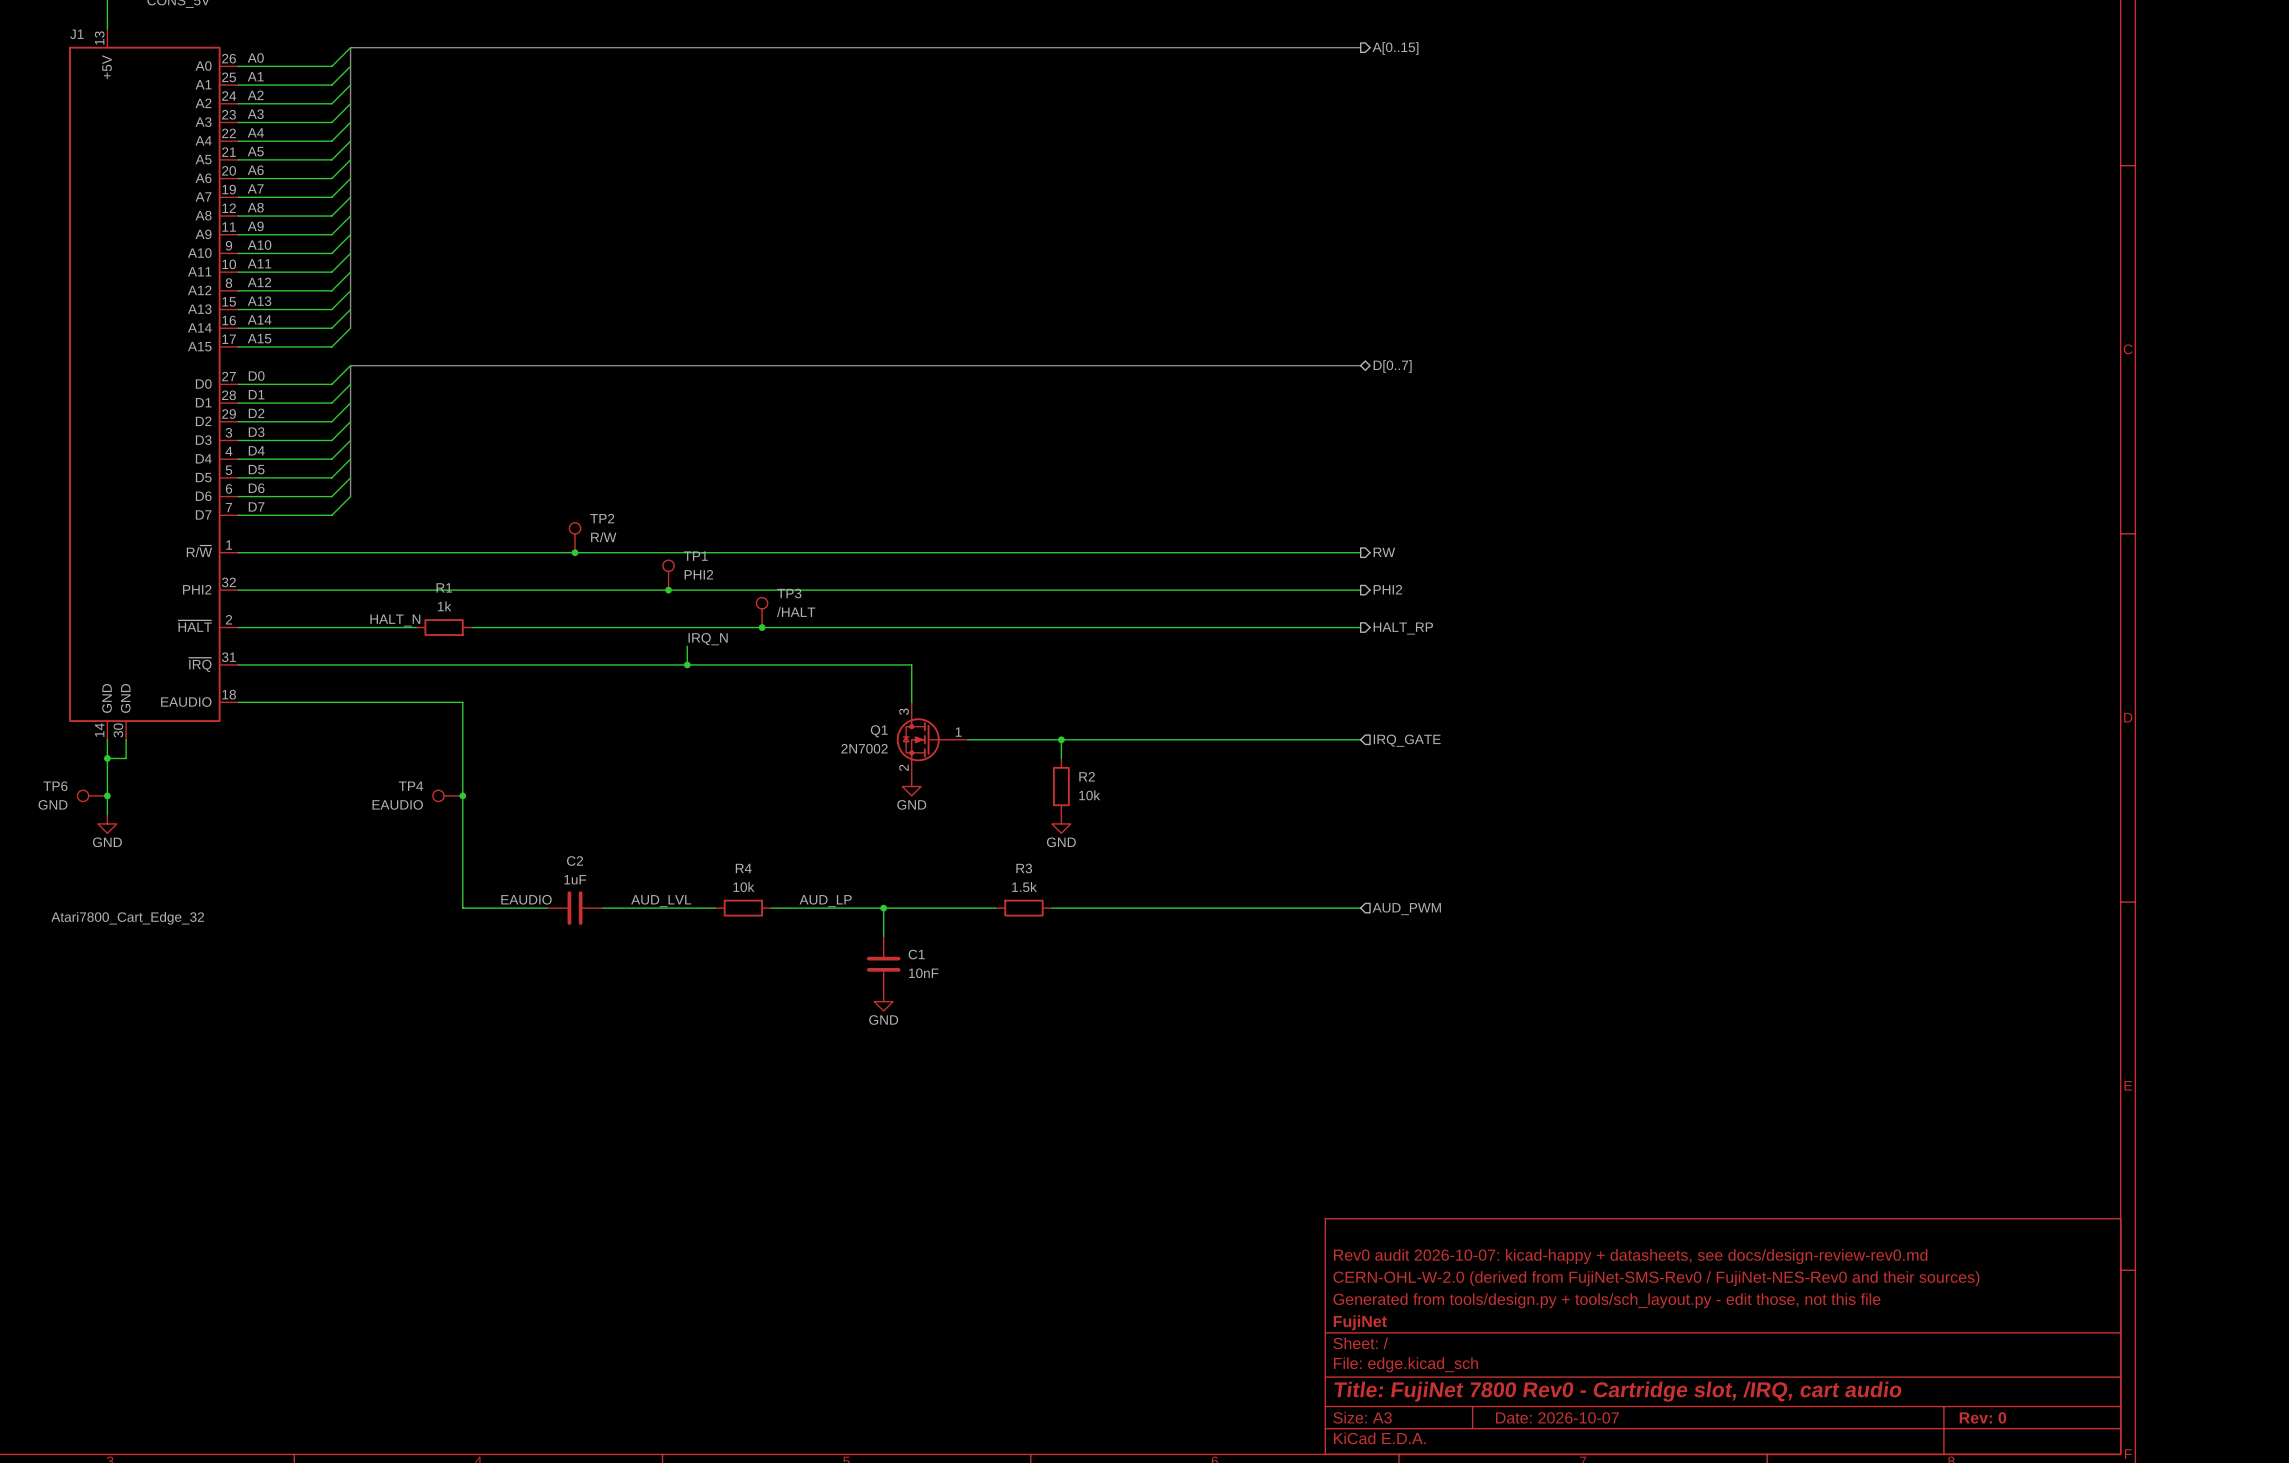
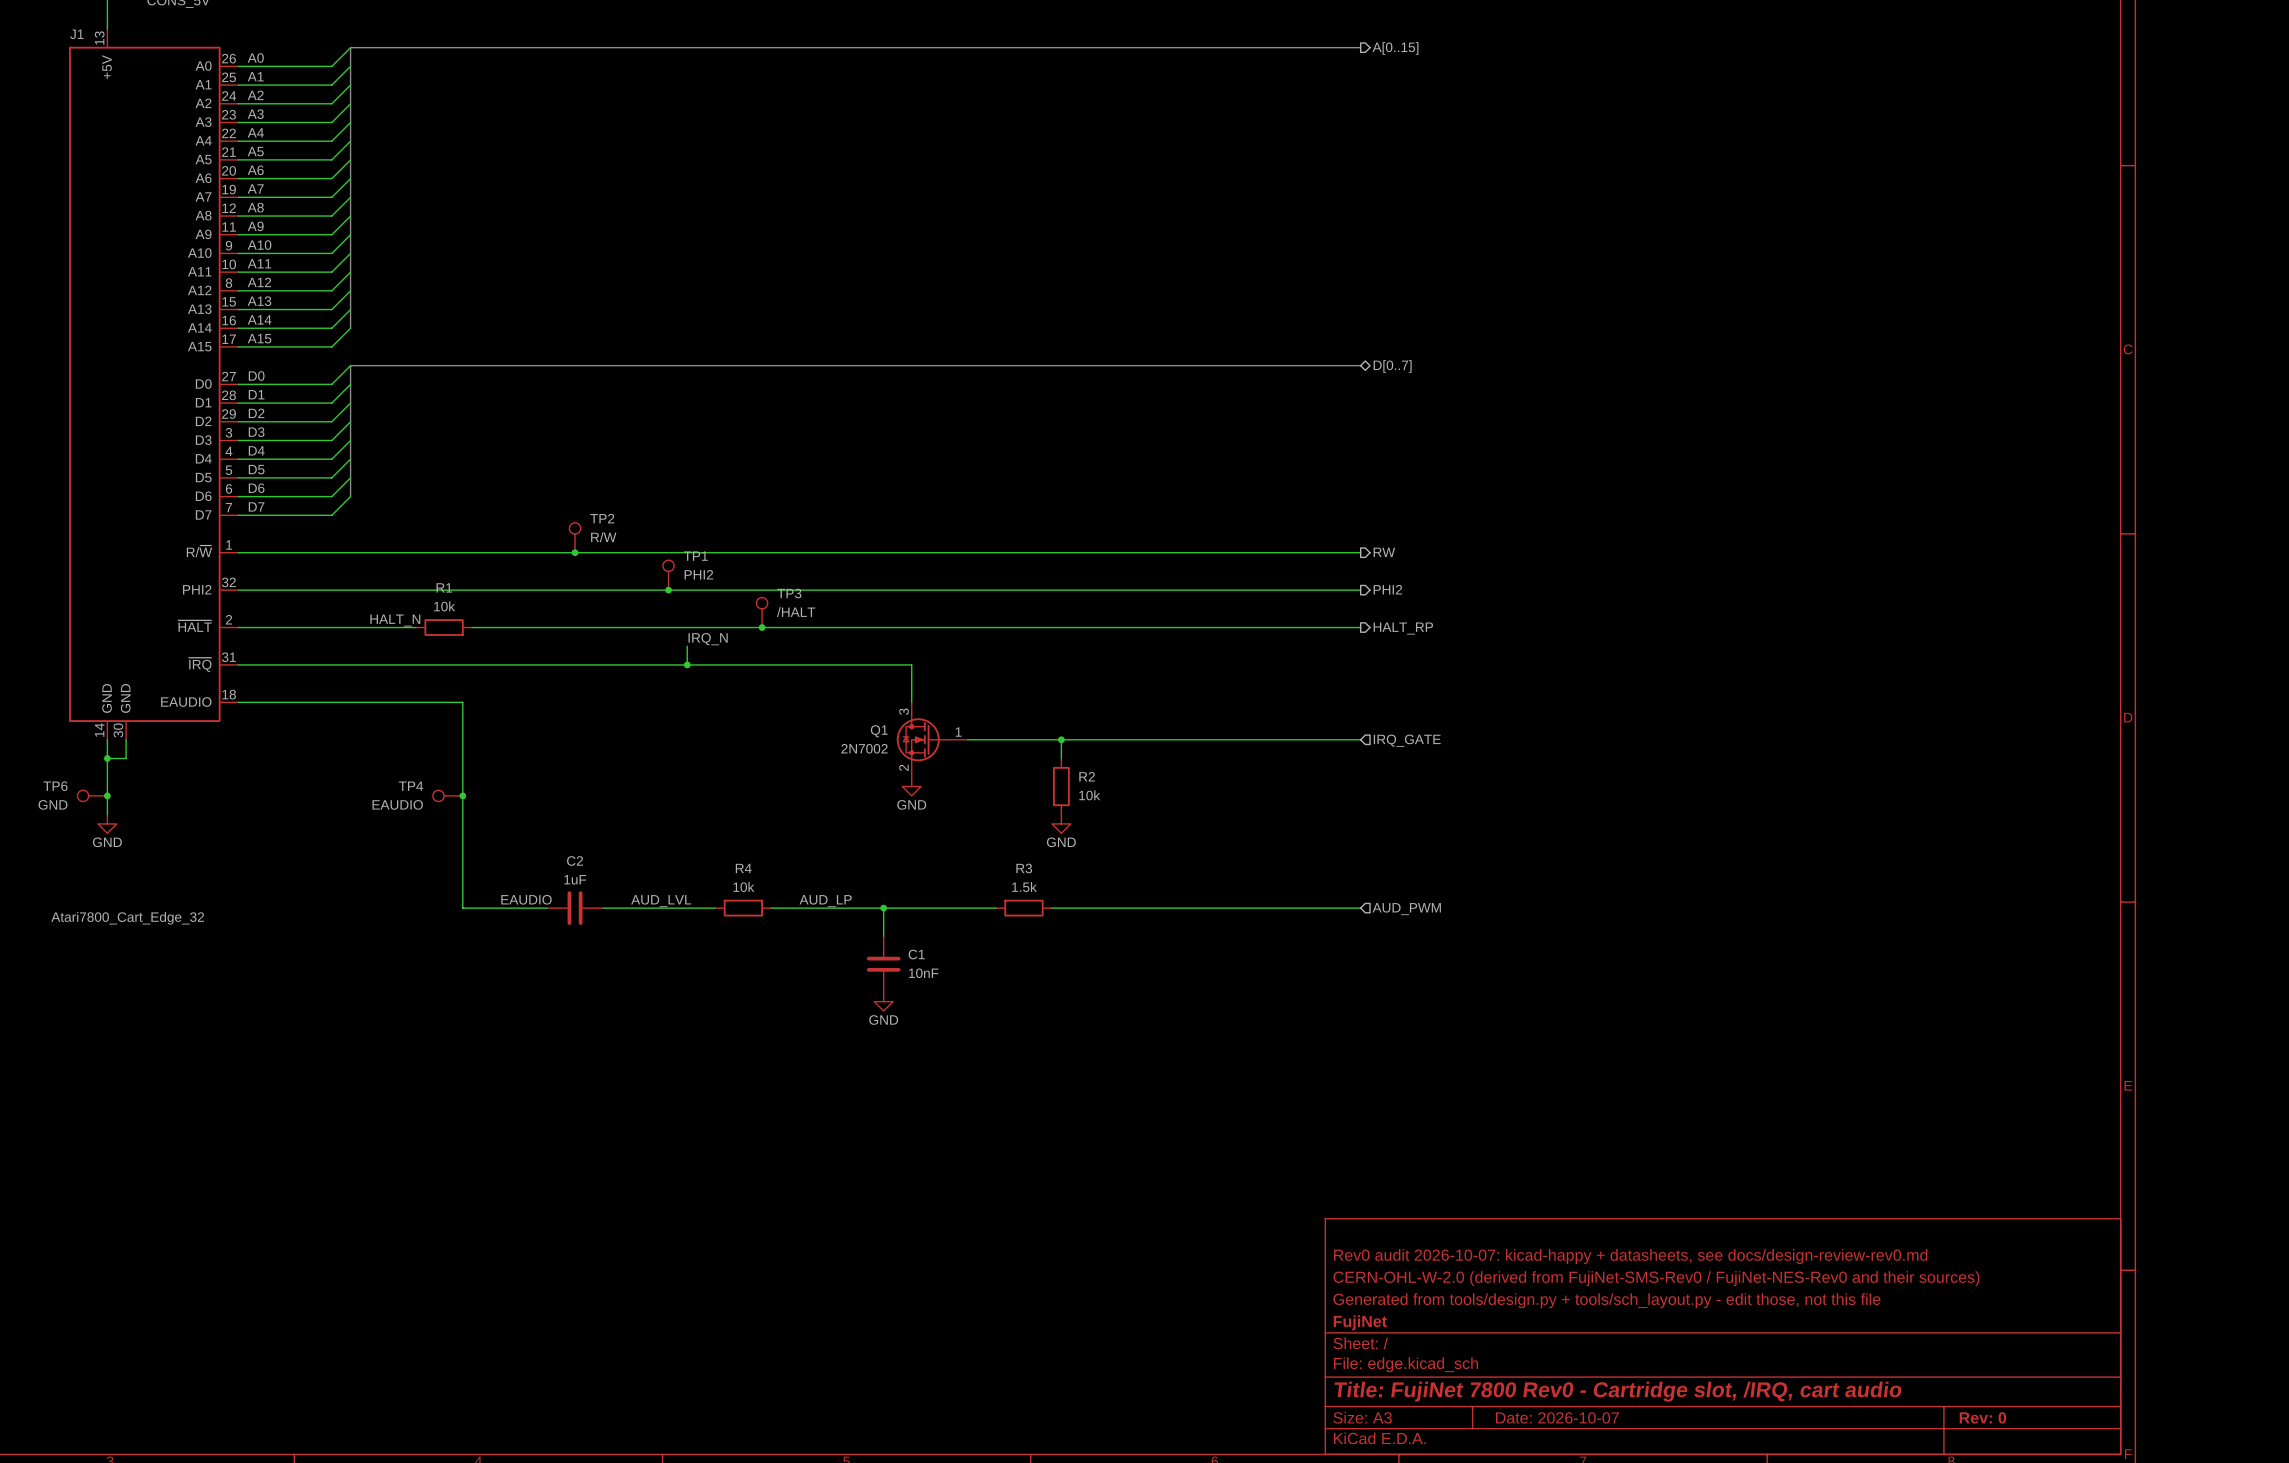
R1 value: 1k (444, 606) -> 10k (444, 606)

